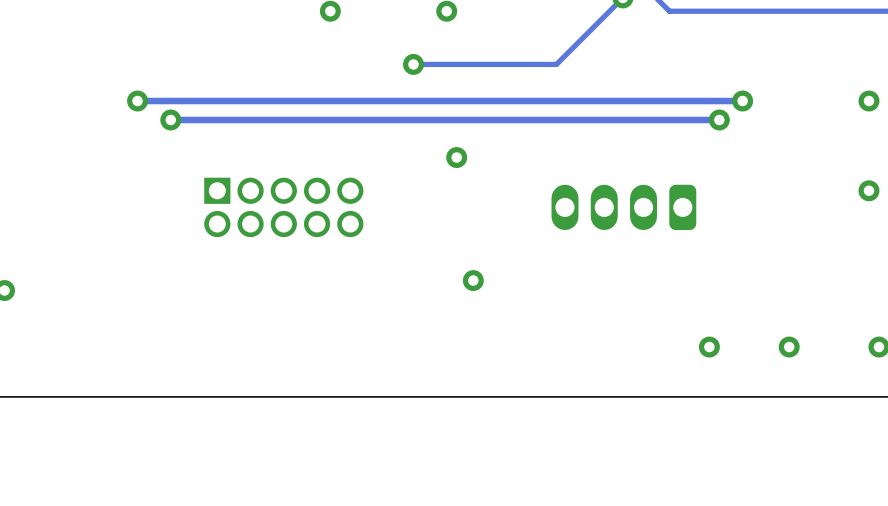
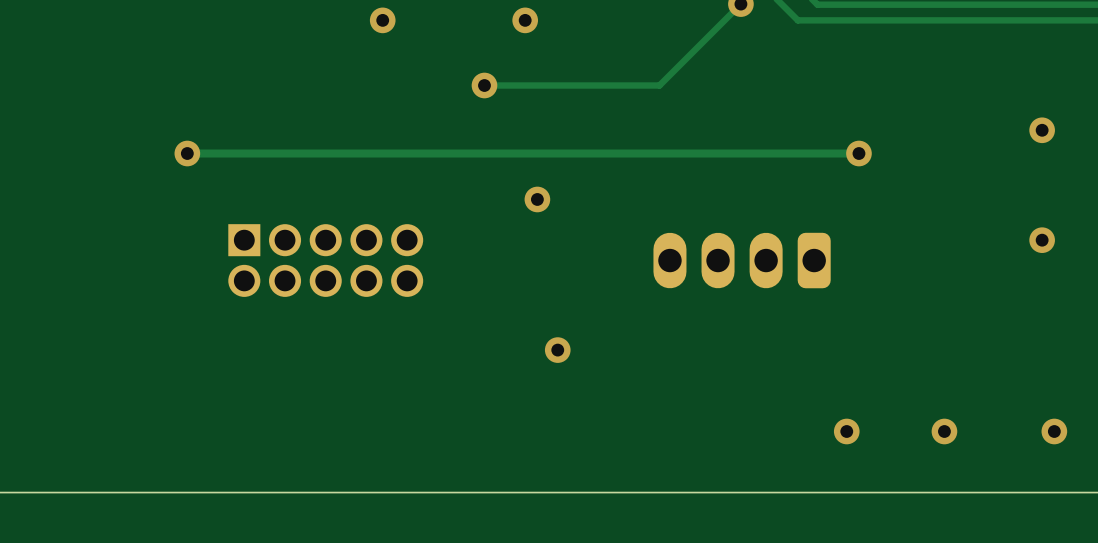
via: (137, 101) -> none
track: (742, 101) (137, 101) -> none
via: (742, 101) -> none

